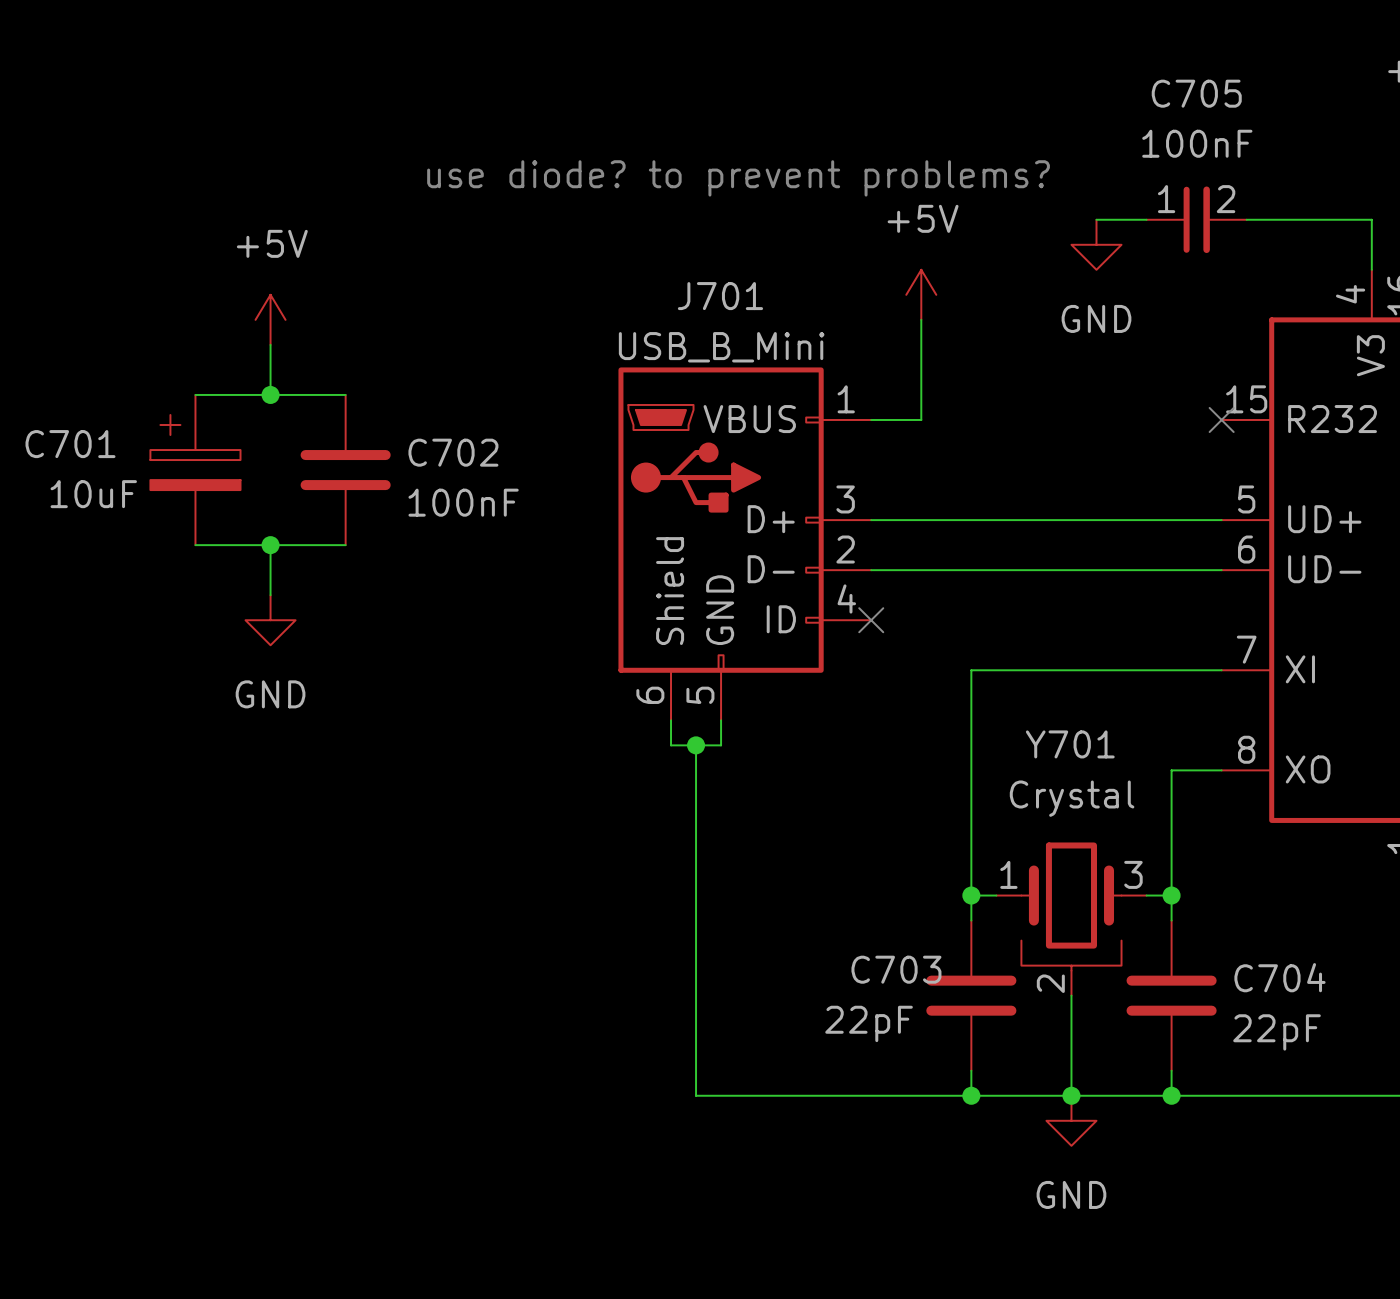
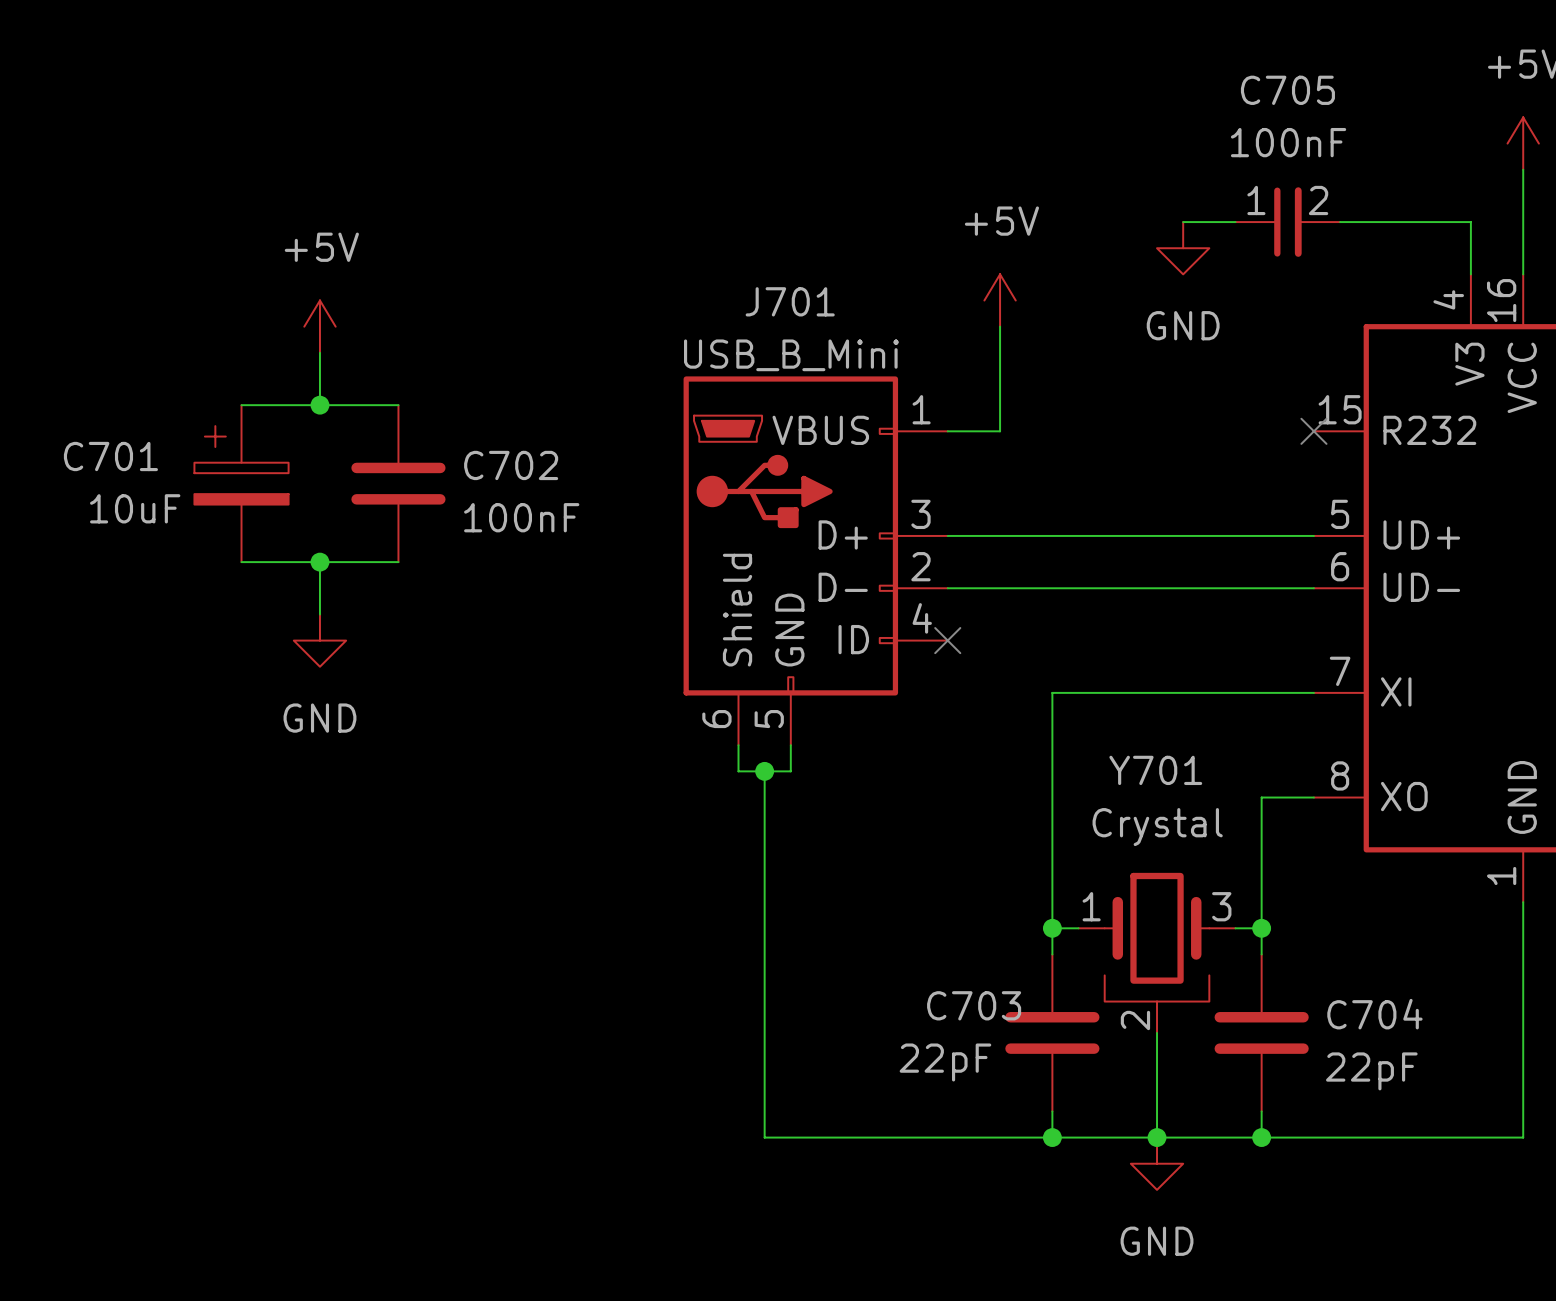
text: use diode? to prevent problems? (738, 178) -> none

